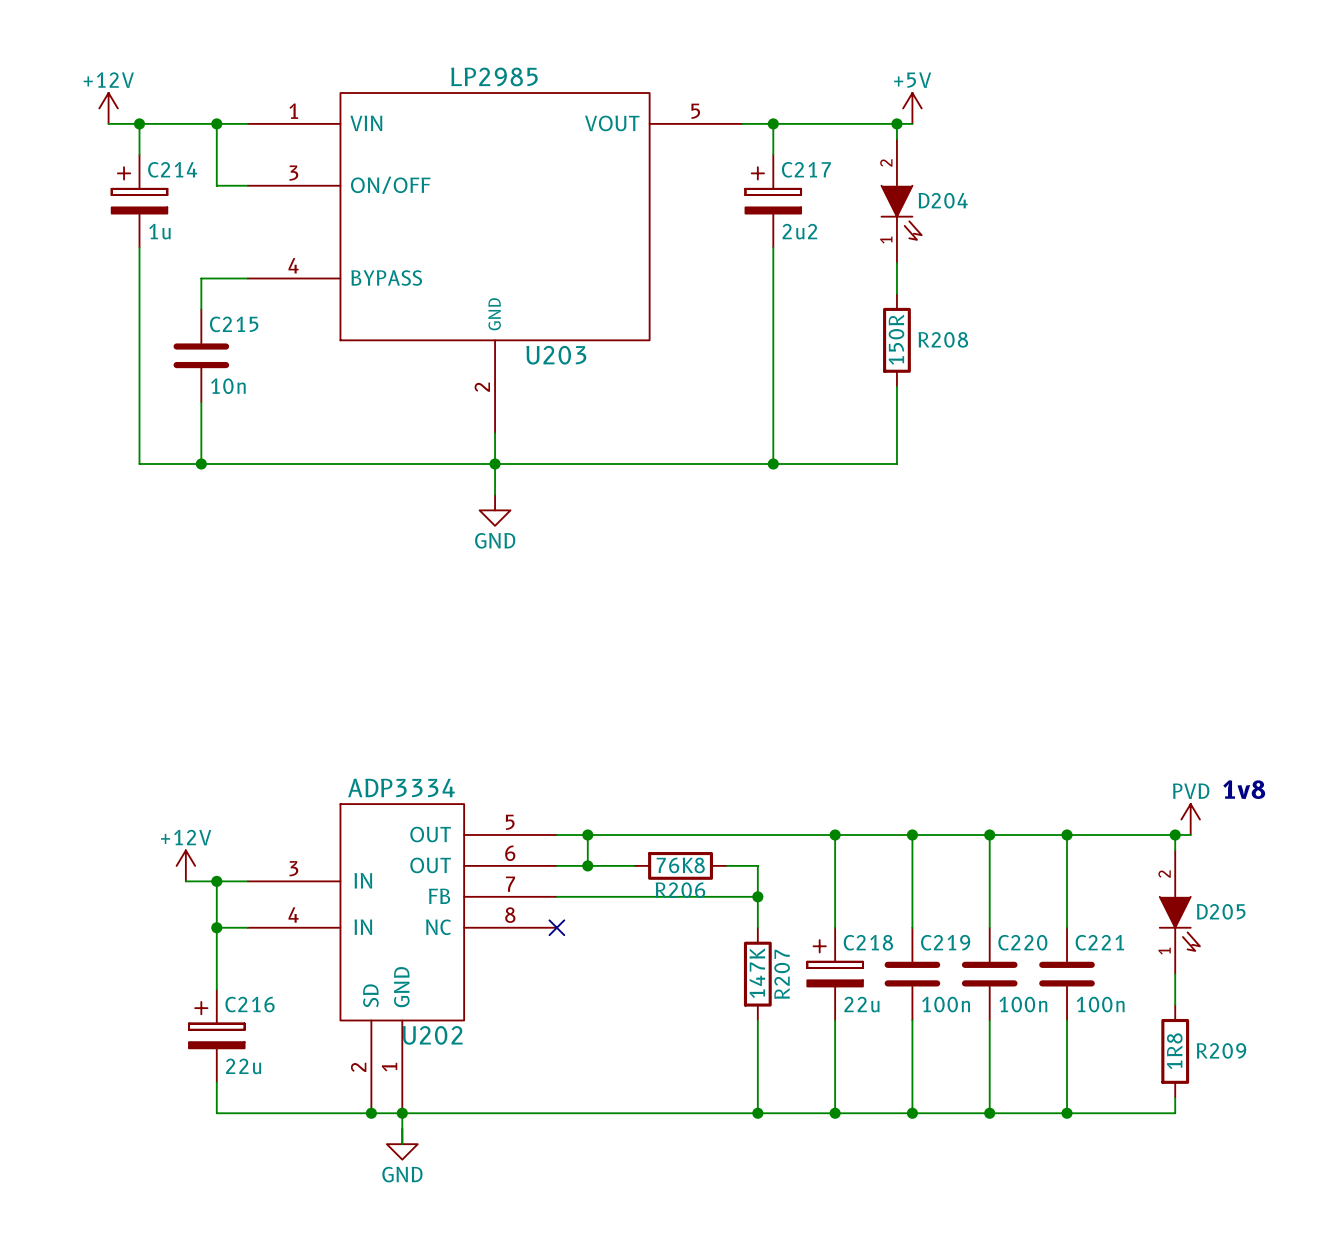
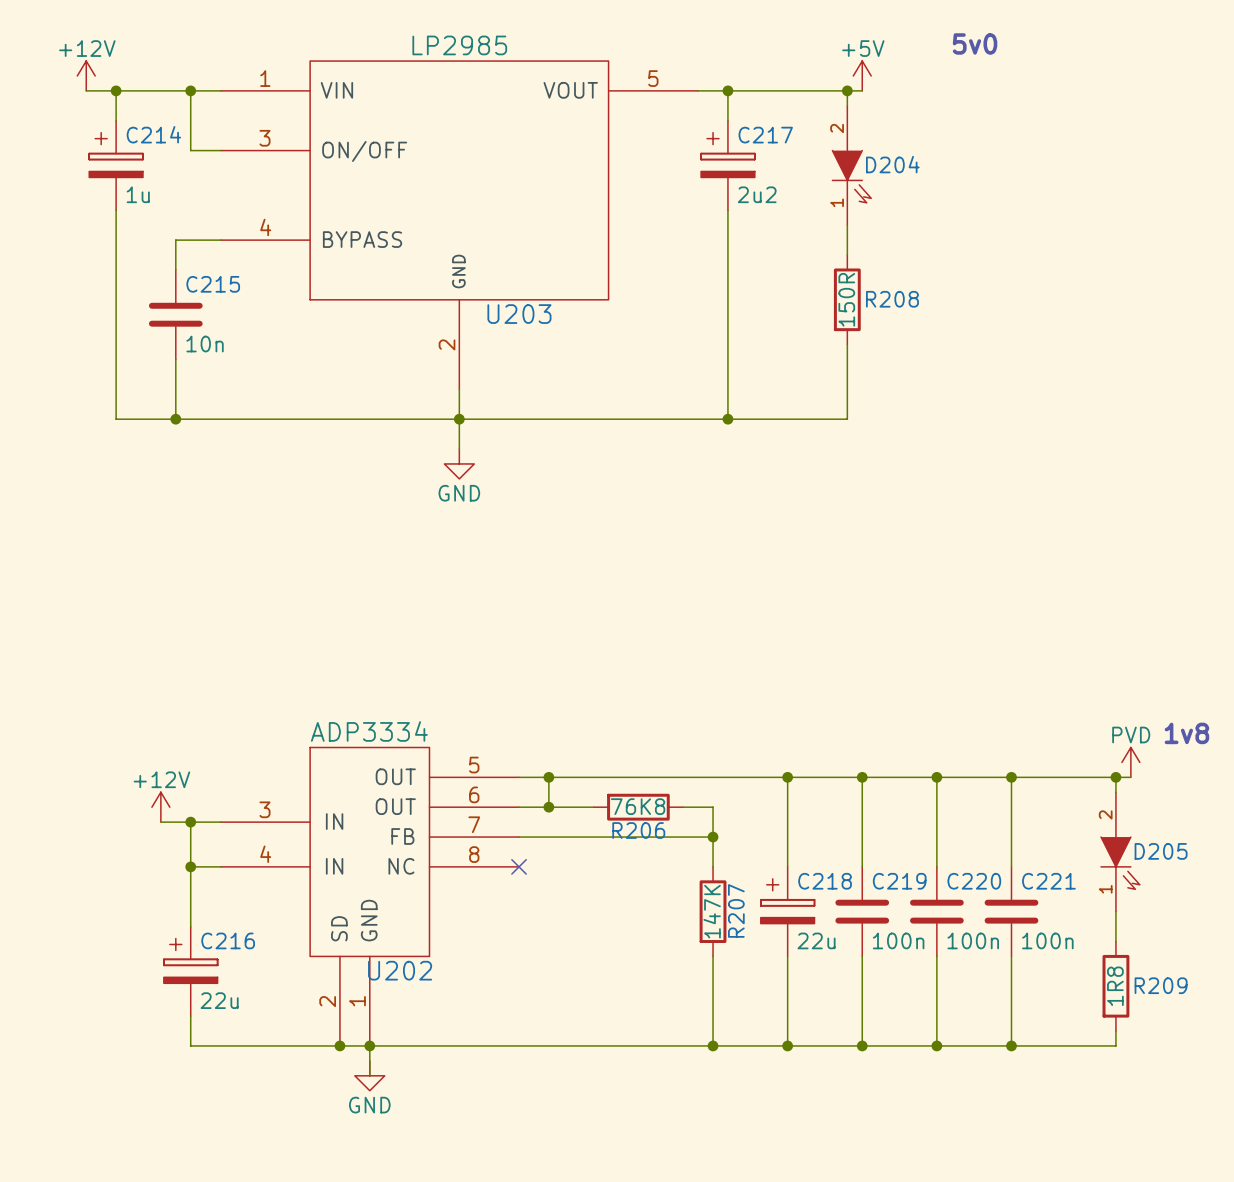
text: none -> 5v0 (975, 43)

